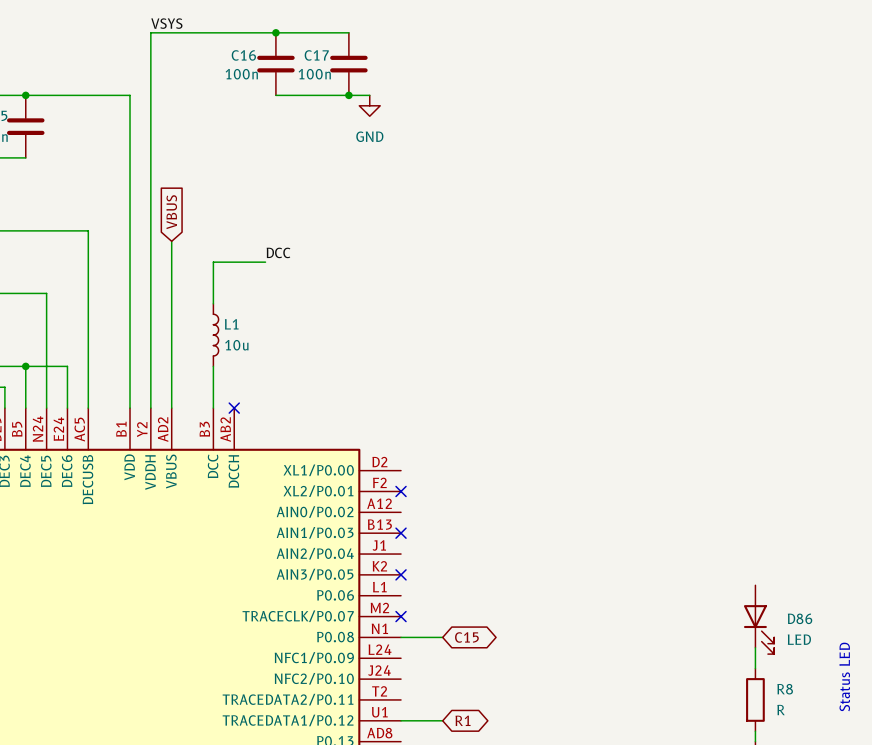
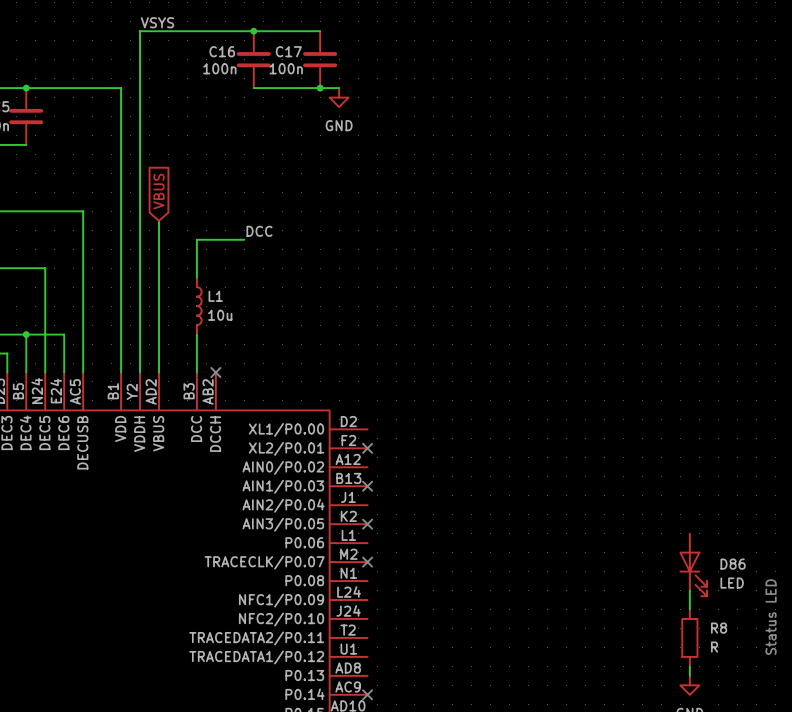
wire: (401, 637) (442, 637) -> none
global label: C15 (466, 637) -> none
wire: (401, 720) (442, 720) -> none
global label: R1 (463, 720) -> none

